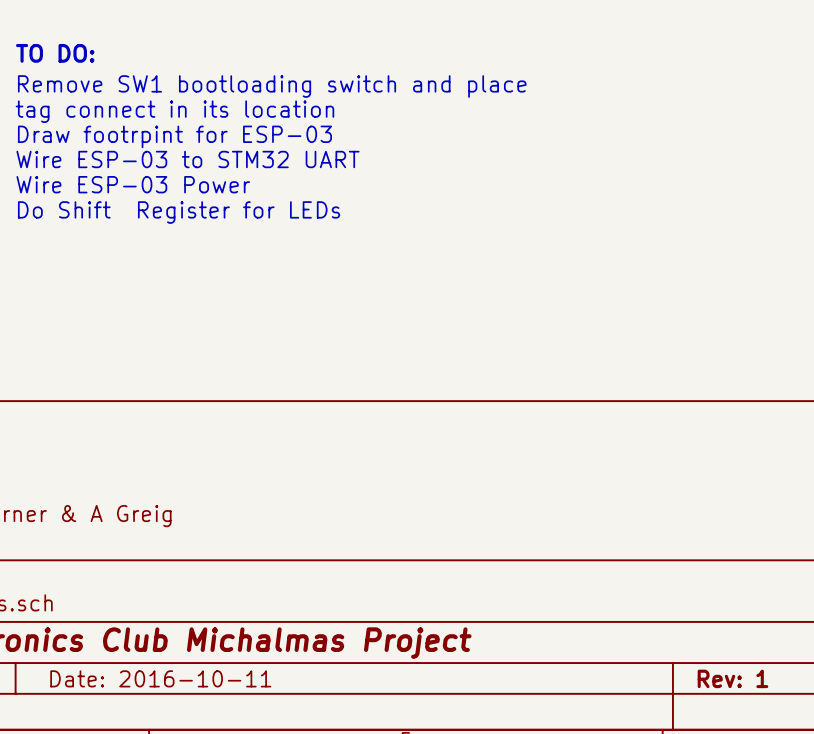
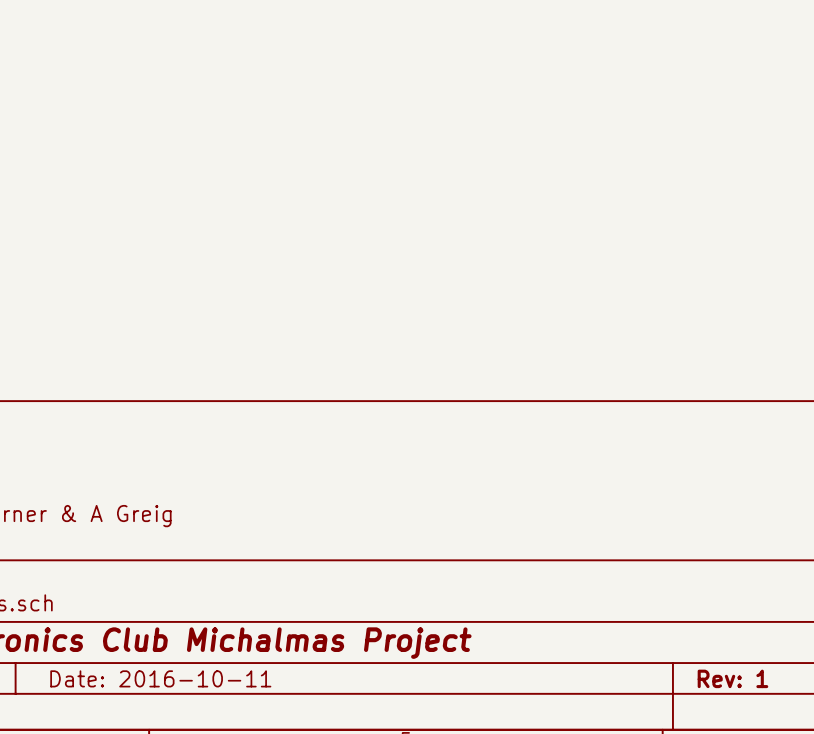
text: TO DO: (55, 53) -> none
text: Remove SW1 bootloading switch and place (272, 86) -> none
text: tag connect in its location (174, 111) -> none
text: Draw footrpint for ESP-03 (174, 136) -> none
text: Wire ESP-03 to STM32 UART (188, 159) -> none
text: Wire ESP-03 Power (133, 184) -> none
text: Do Shift Register for LEDs (179, 212) -> none

